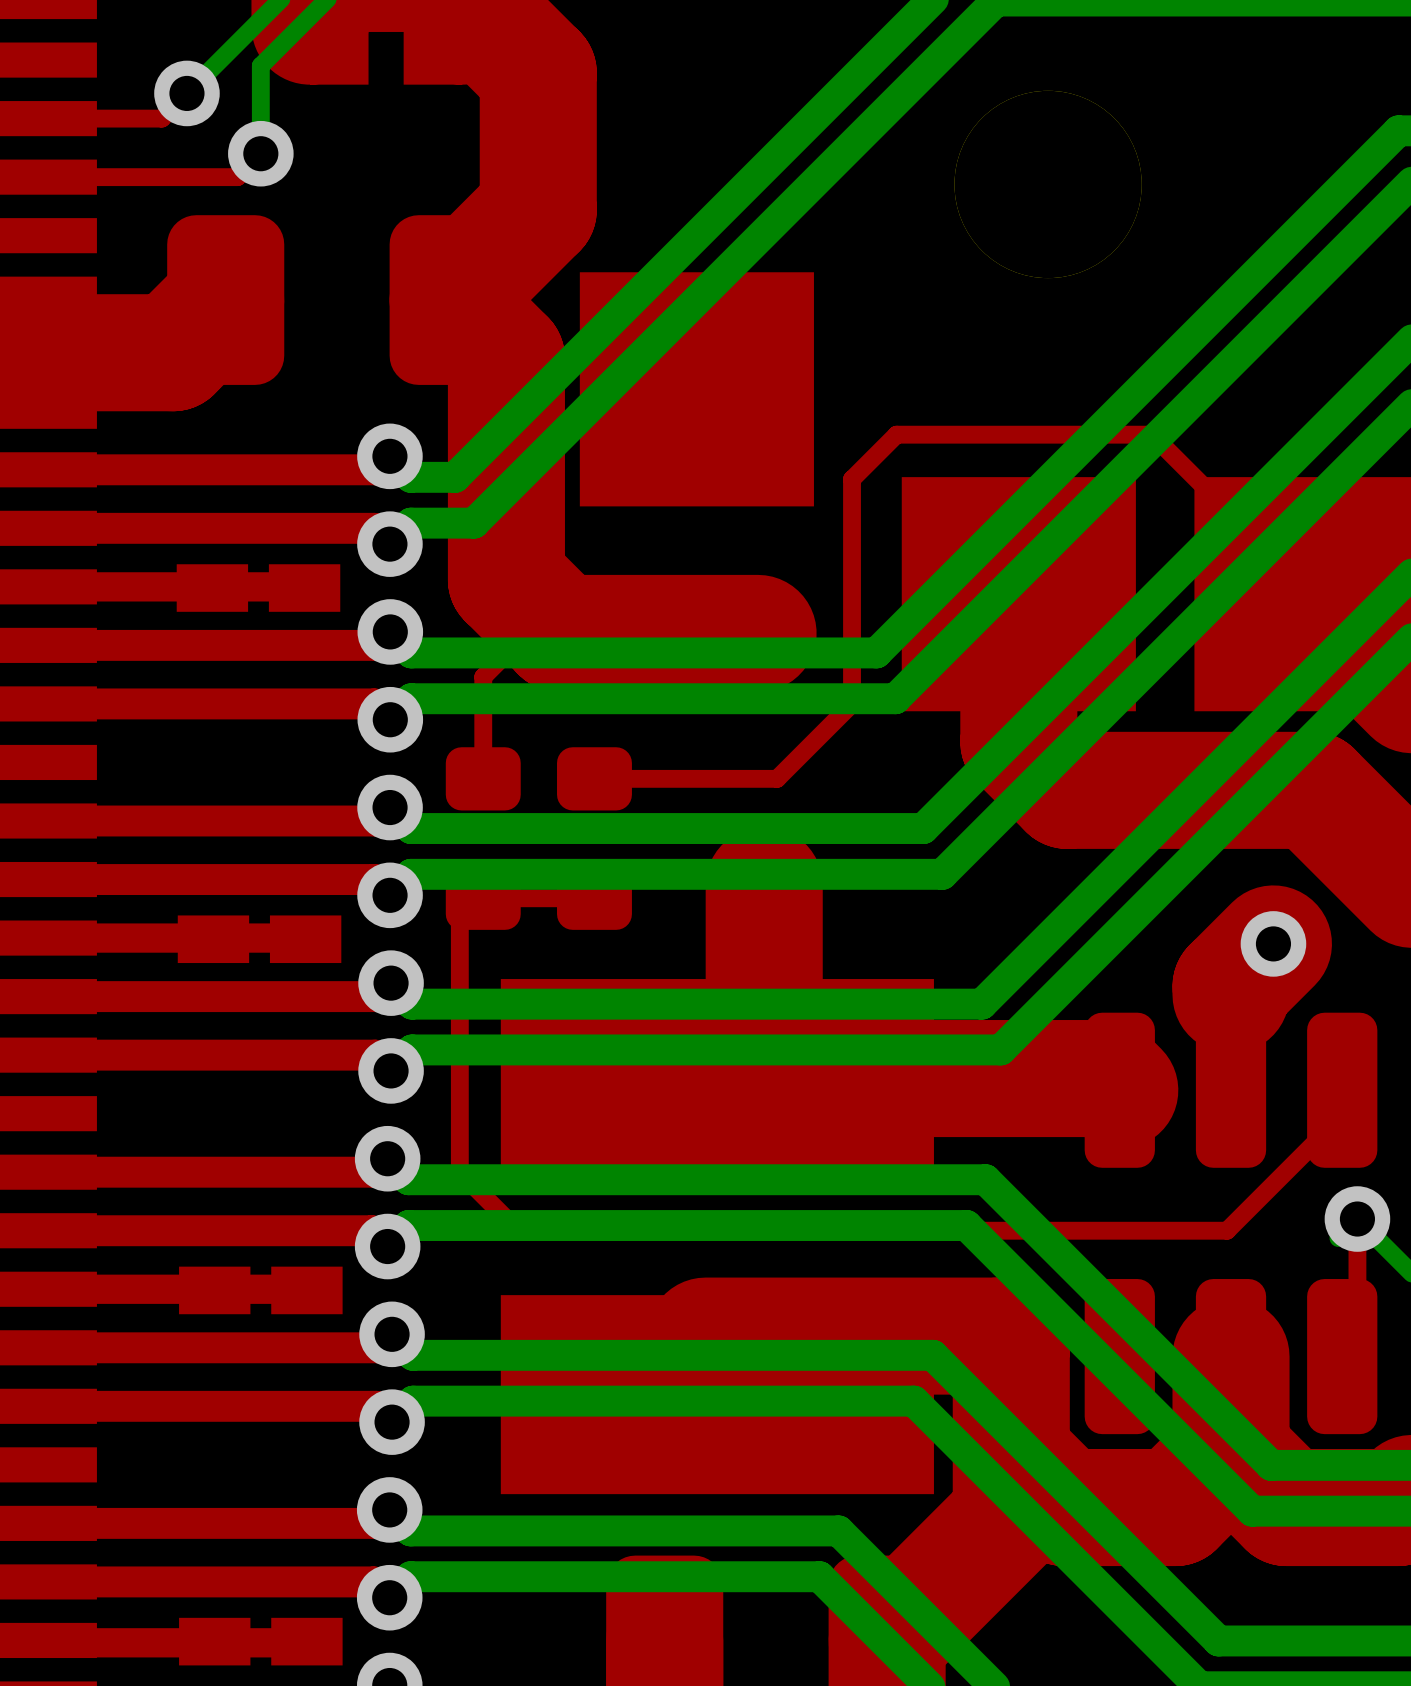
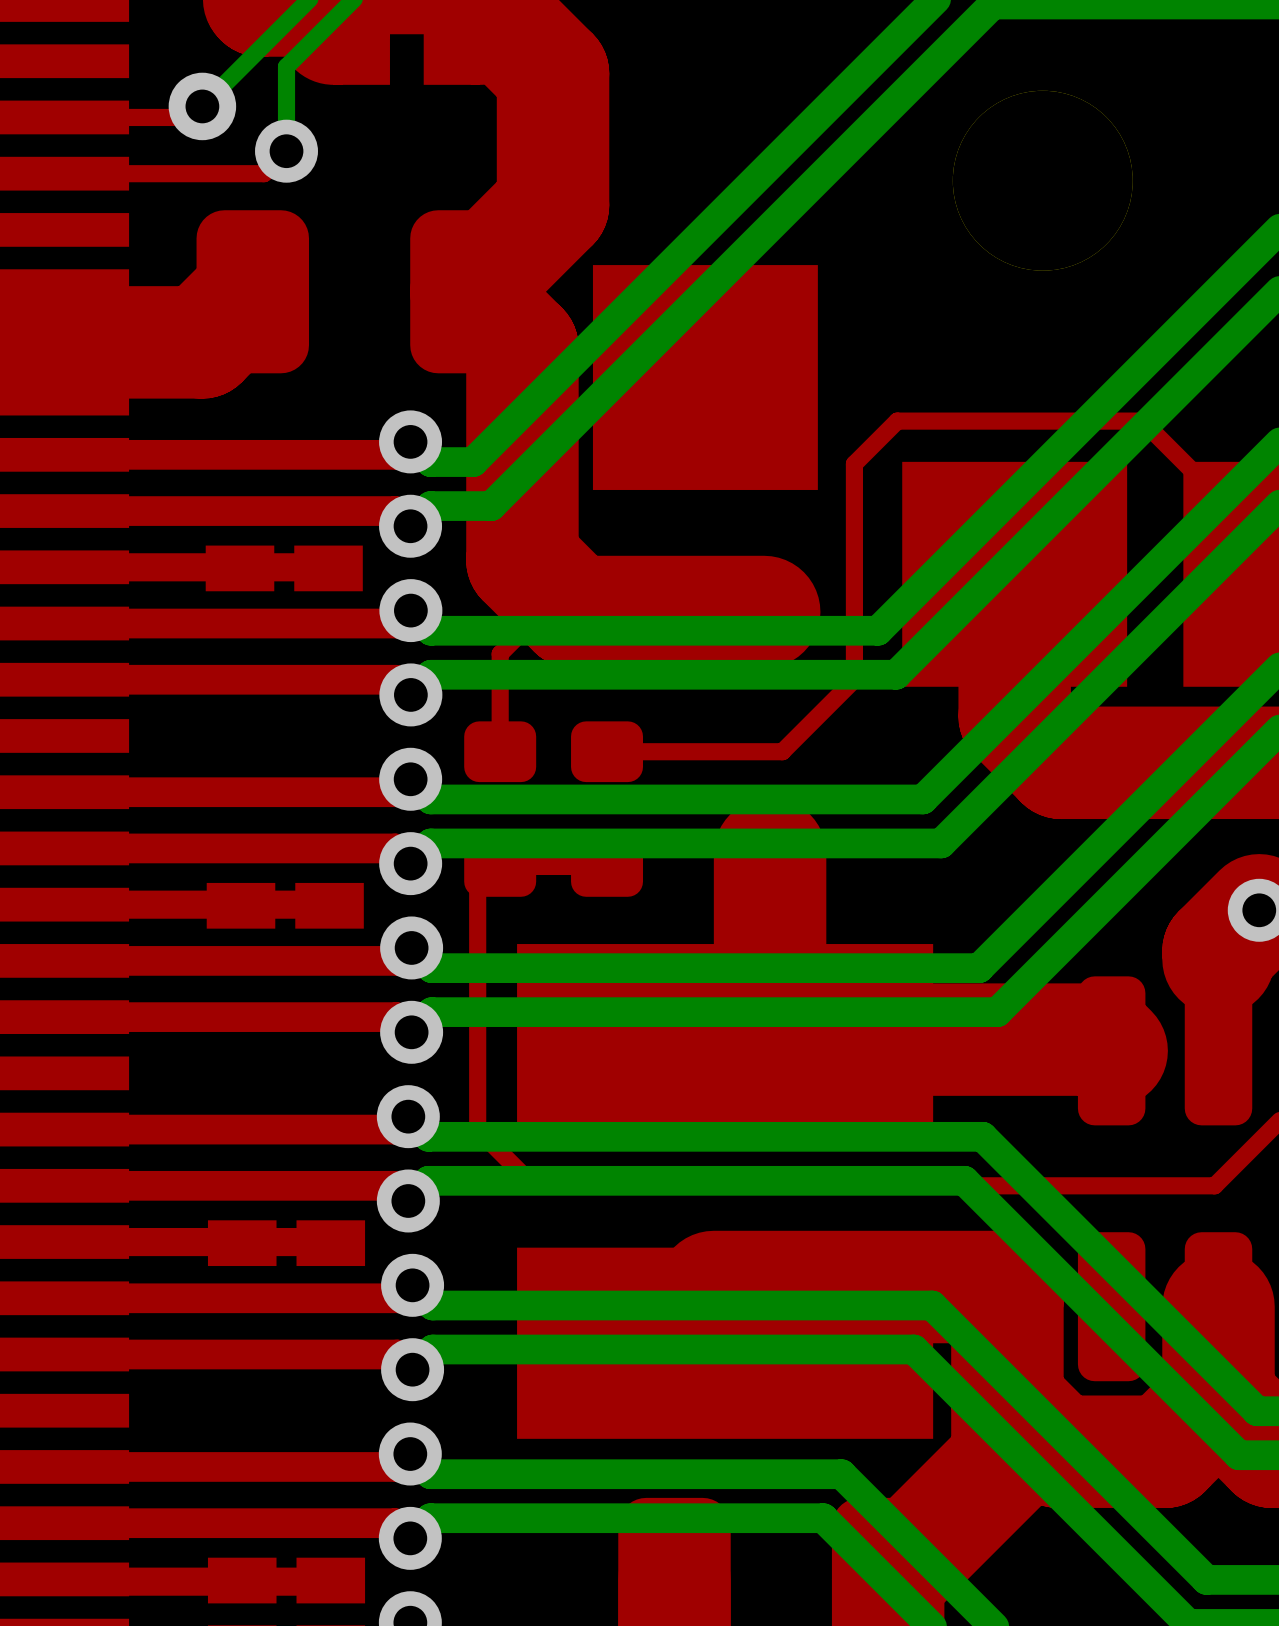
via position: (186, 93) -> (202, 106)

